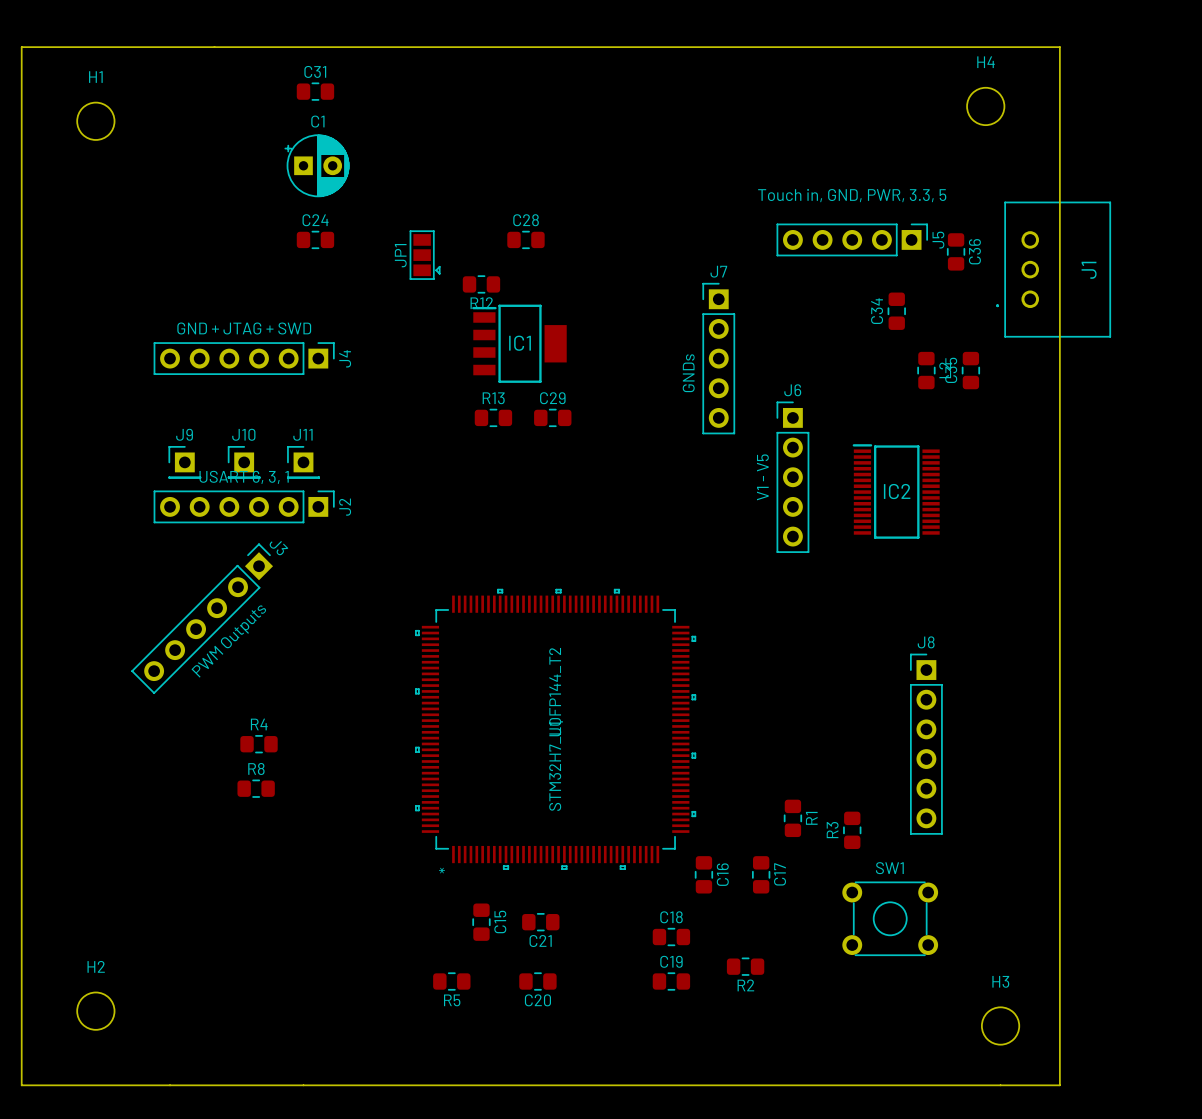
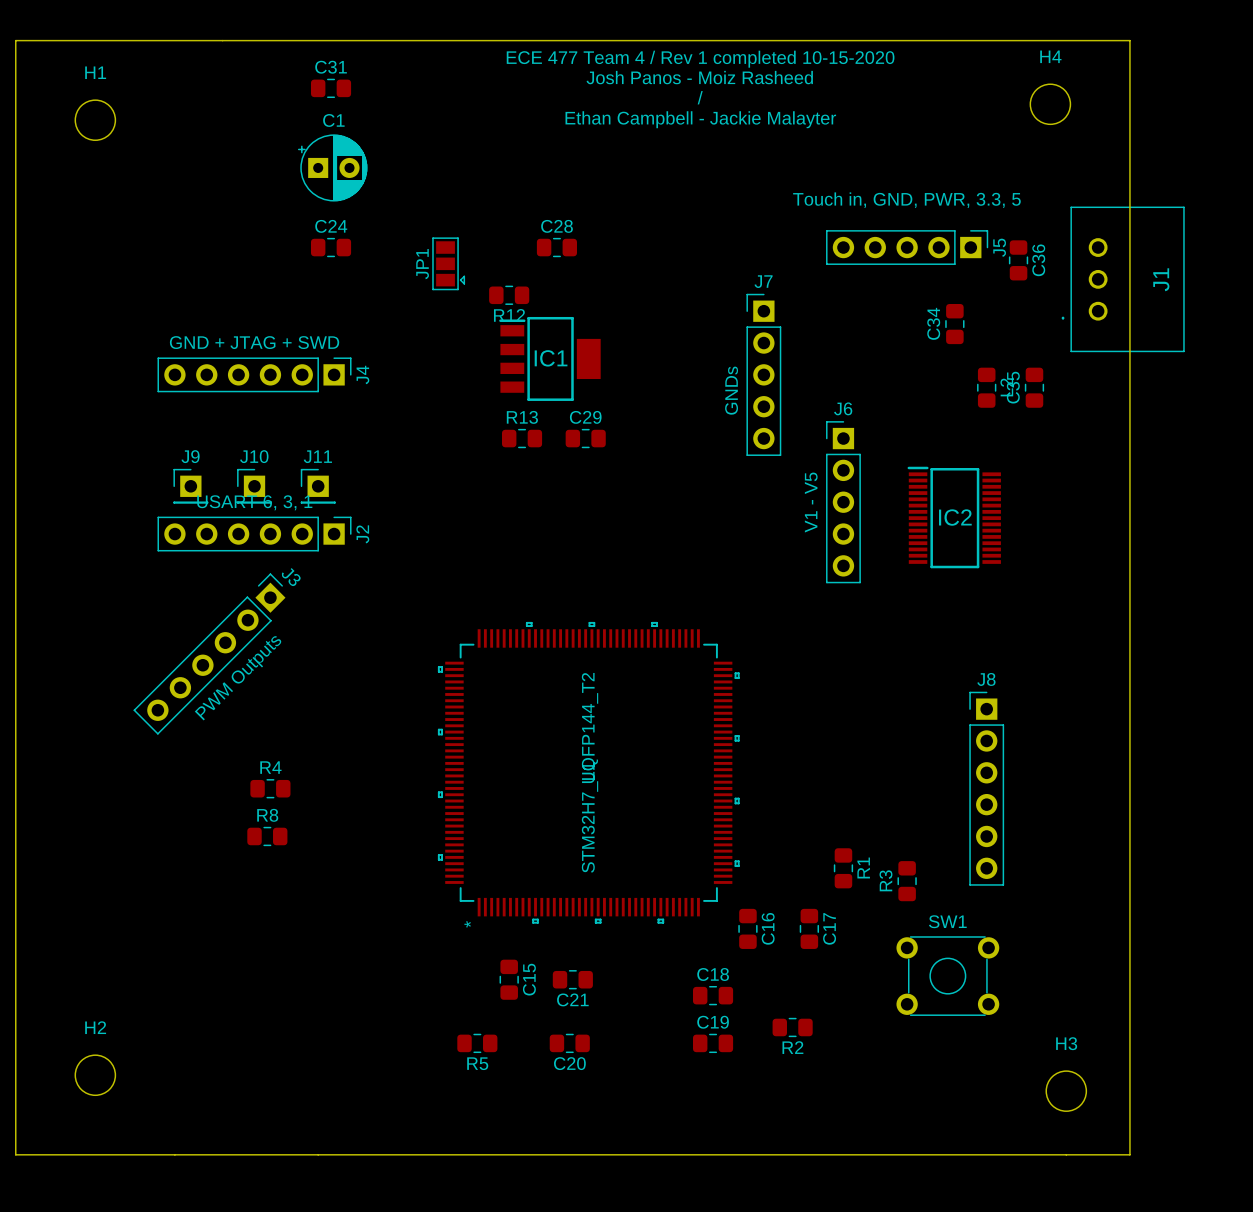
text: none -> ECE 477 Team 4 / Rev 1 completed 10-15-2020 (700, 59)
text: none -> Josh Panos - Moiz Rasheed (699, 77)
text: none -> / (700, 97)
text: none -> Ethan Campbell - Jackie Malayter (700, 119)

